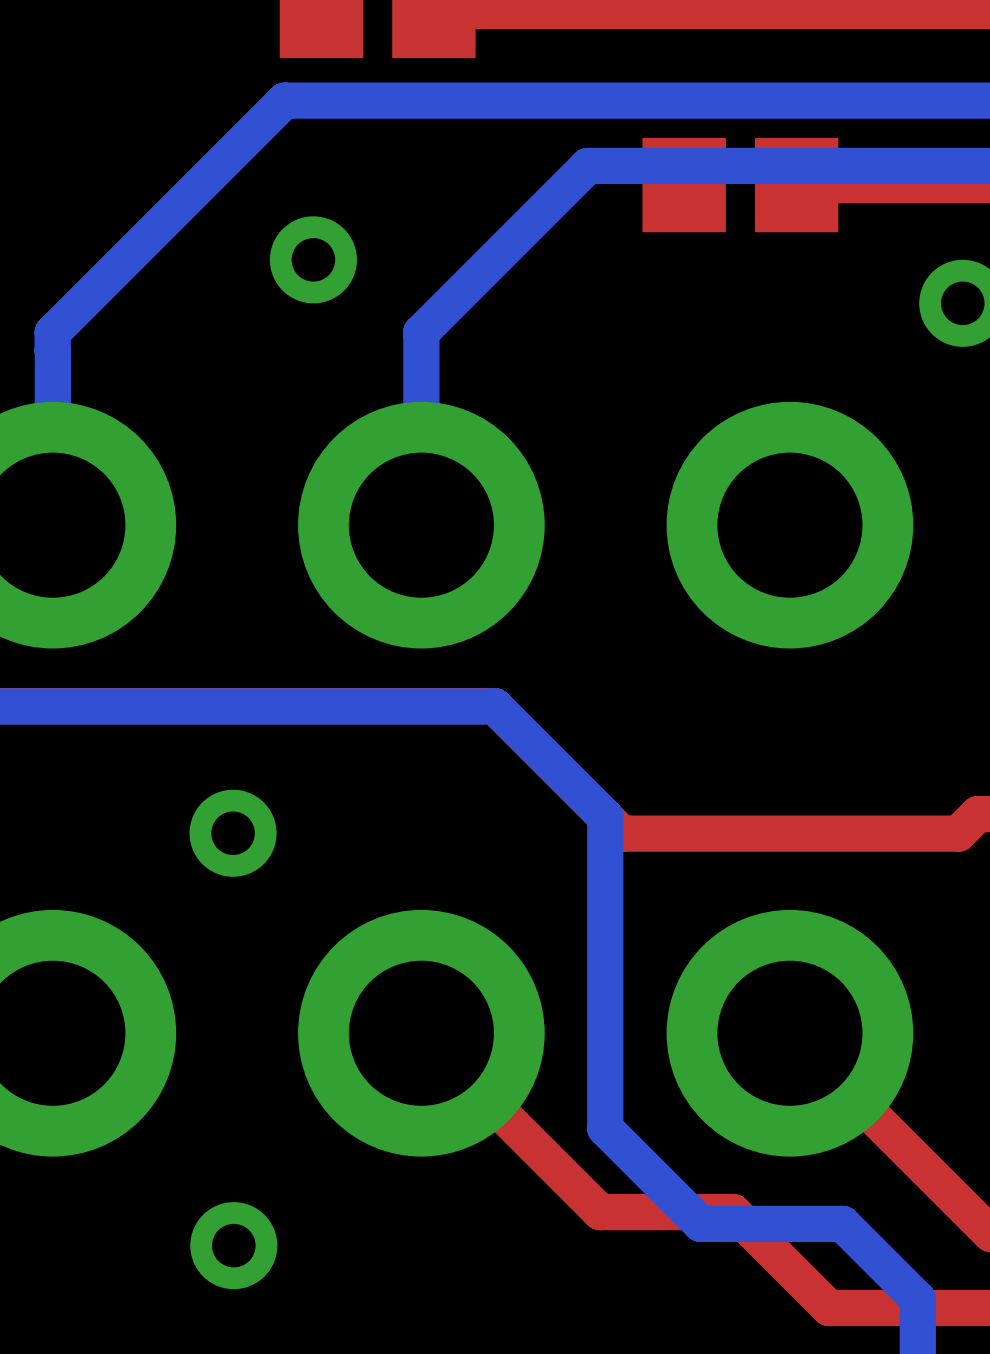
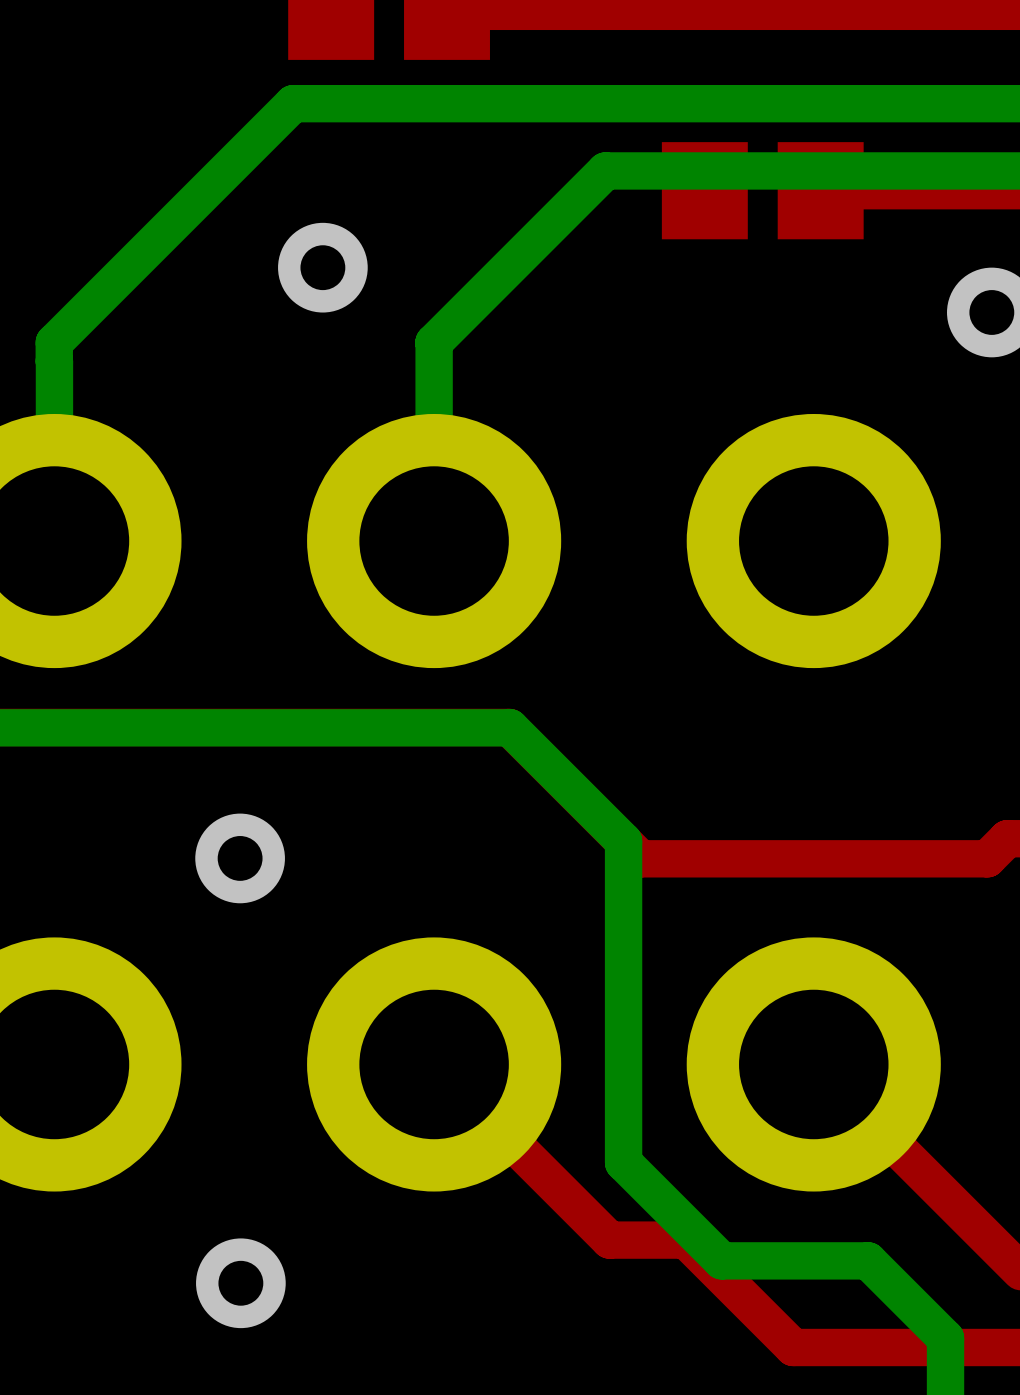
top track: (591, 1203) (600, 1212) (733, 1212) (829, 1307) -> (609, 1240) (685, 1240) (793, 1347) (854, 1347)

